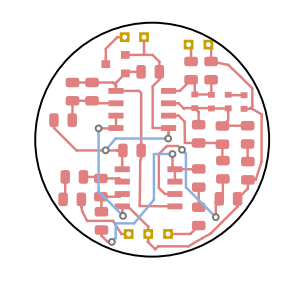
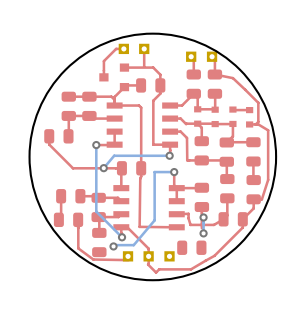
top track: (181, 149) (178, 145) (166, 145) (158, 154) (158, 187) (164, 194) (174, 194) -> none
bottom track: (182, 149) (185, 153) (185, 187) (215, 217) -> none
via: (182, 149) -> none
bottom track: none -> (203, 217) (203, 233)
via: none -> (203, 217)
top track: (219, 198) (215, 202) (215, 217) -> (223, 219) (214, 224) (190, 224) (188, 213) (176, 214)
top track: (81, 207) (87, 220) (113, 220) (121, 233) (128, 233) -> (78, 228) (78, 248) (93, 259) (128, 260)
via: none -> (203, 233)
part rotation: 0° (198, 216) -> 90° clockwise (191, 247)
via: (215, 217) -> none
bottom track: (115, 223) (115, 238) (111, 241) -> none
top track: (198, 225) (190, 233) (168, 233) -> none
top track: (101, 230) (101, 235) (107, 241) (111, 241) -> none
via position: (111, 241) -> (113, 246)

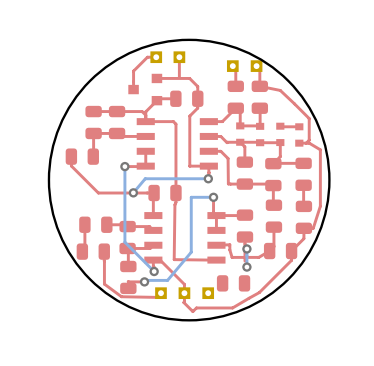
top track: none -> (128, 281) (144, 281)

